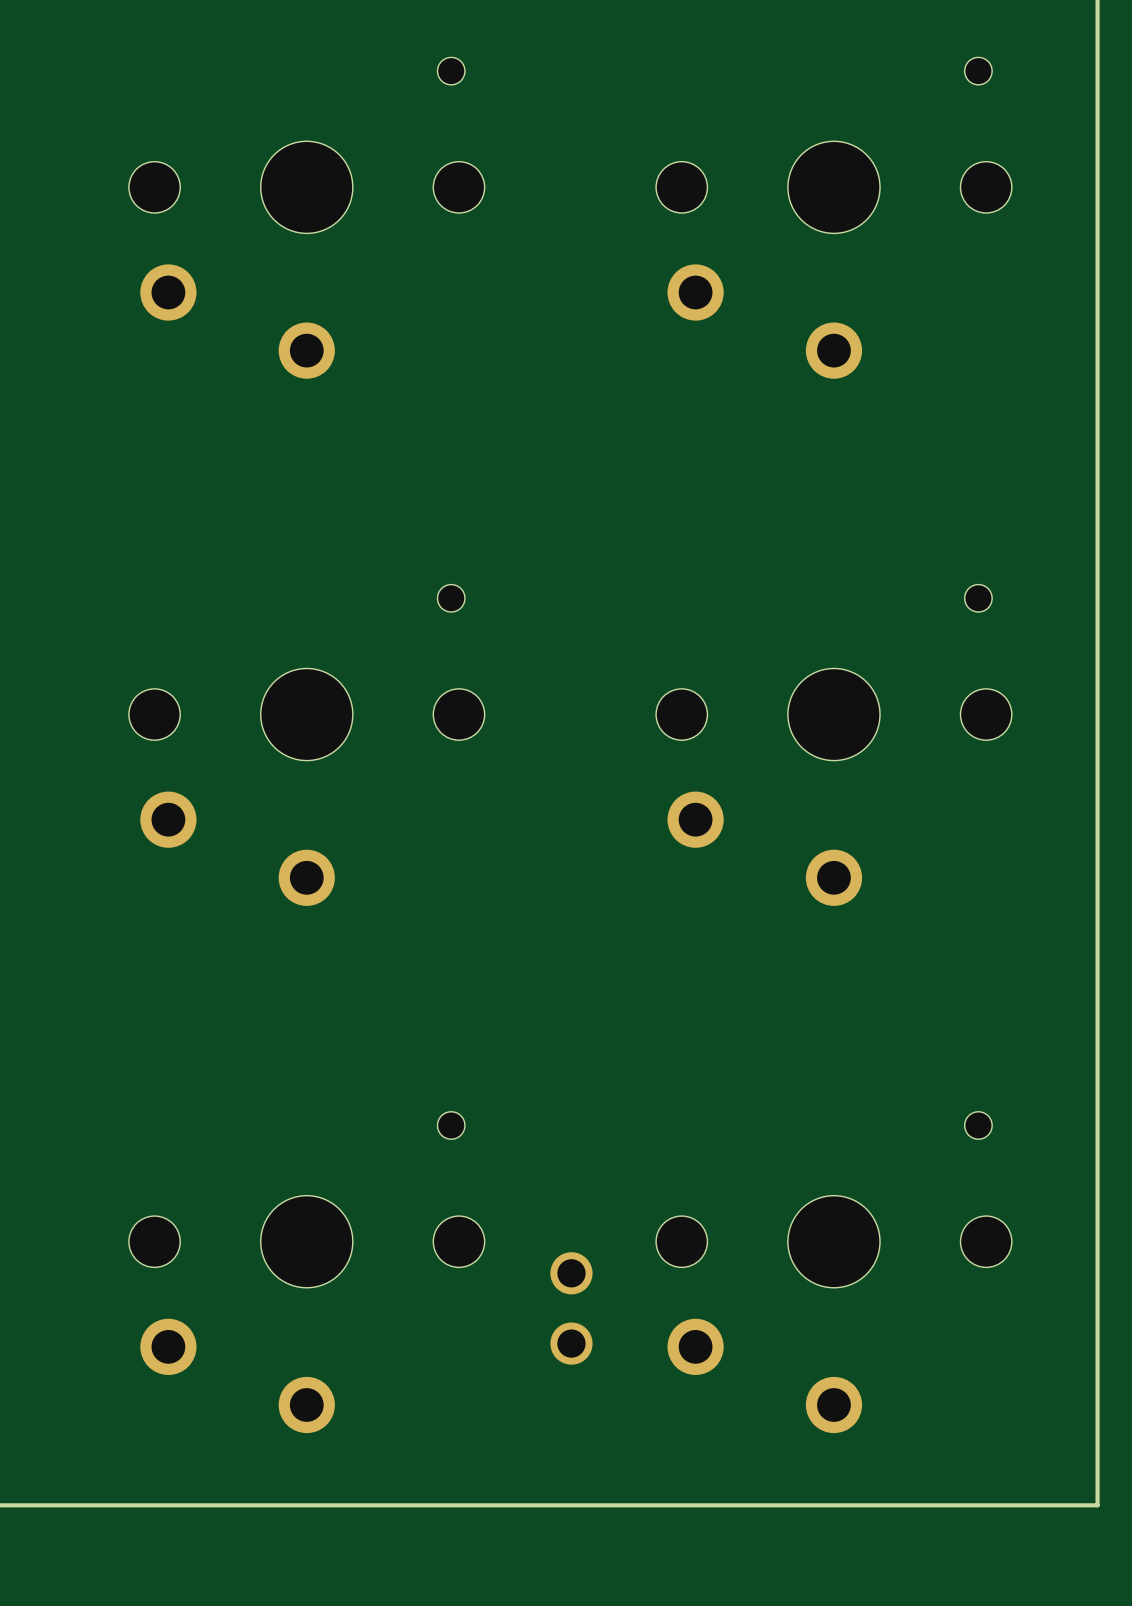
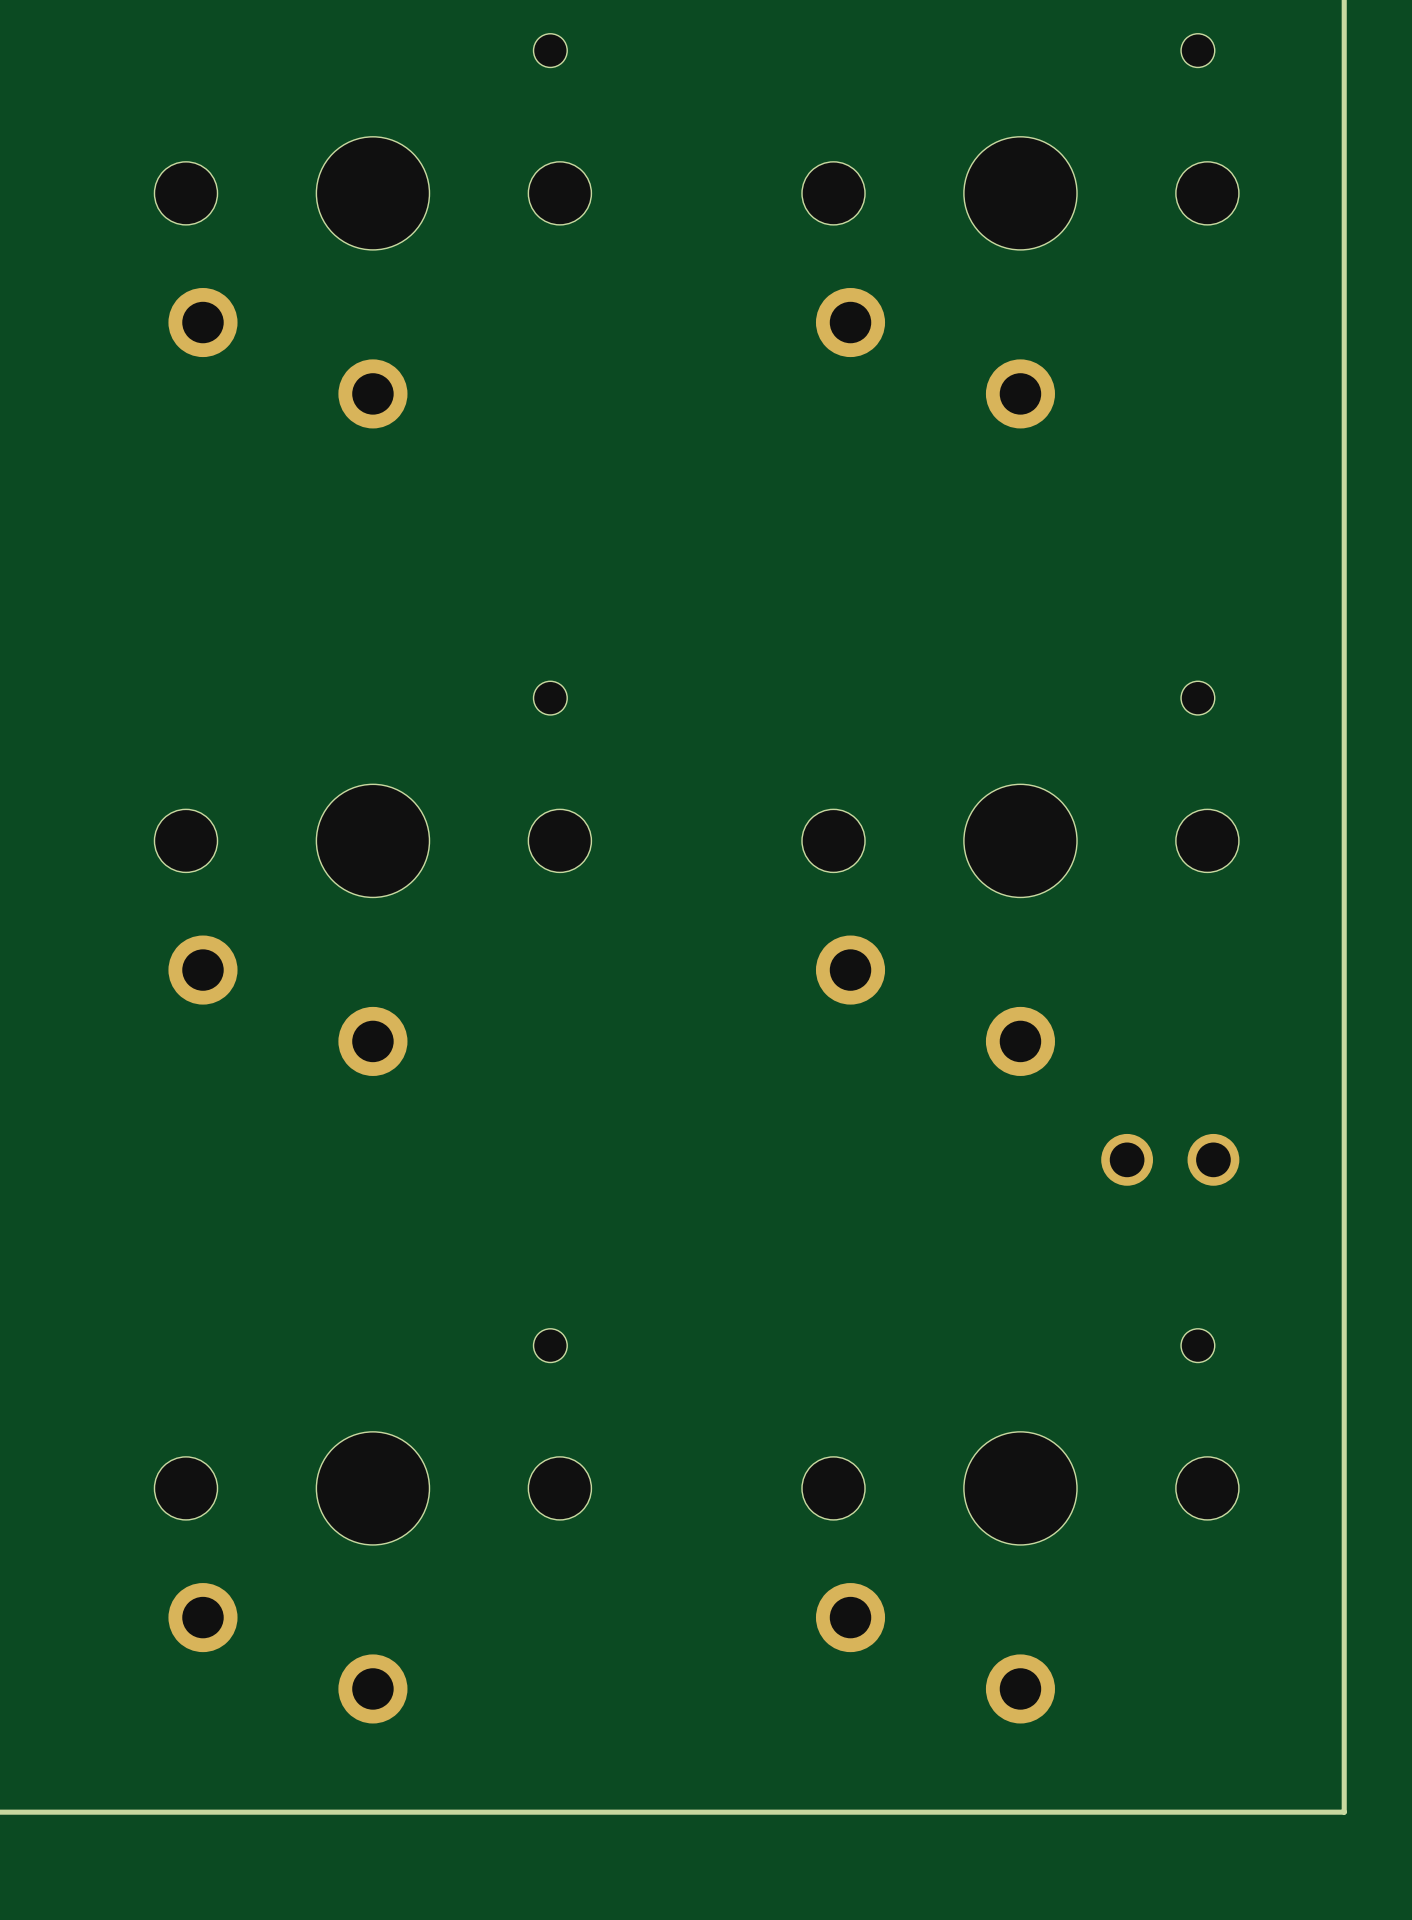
part rotation: 0° (571, 1308) -> 90° clockwise (1170, 1159)
part position: (571, 1308) -> (1170, 1159)

